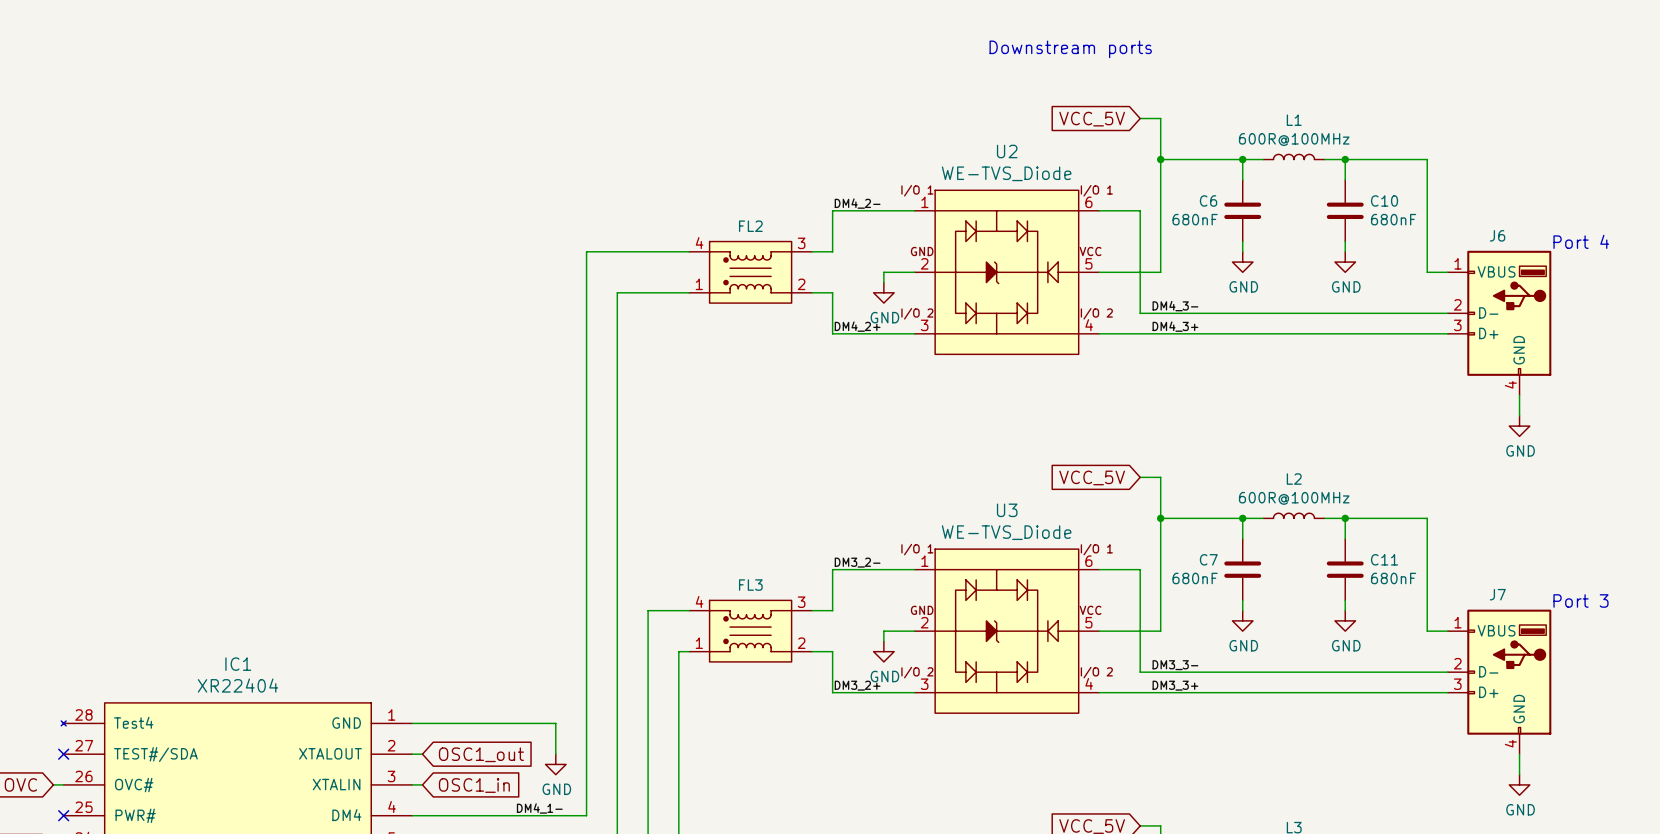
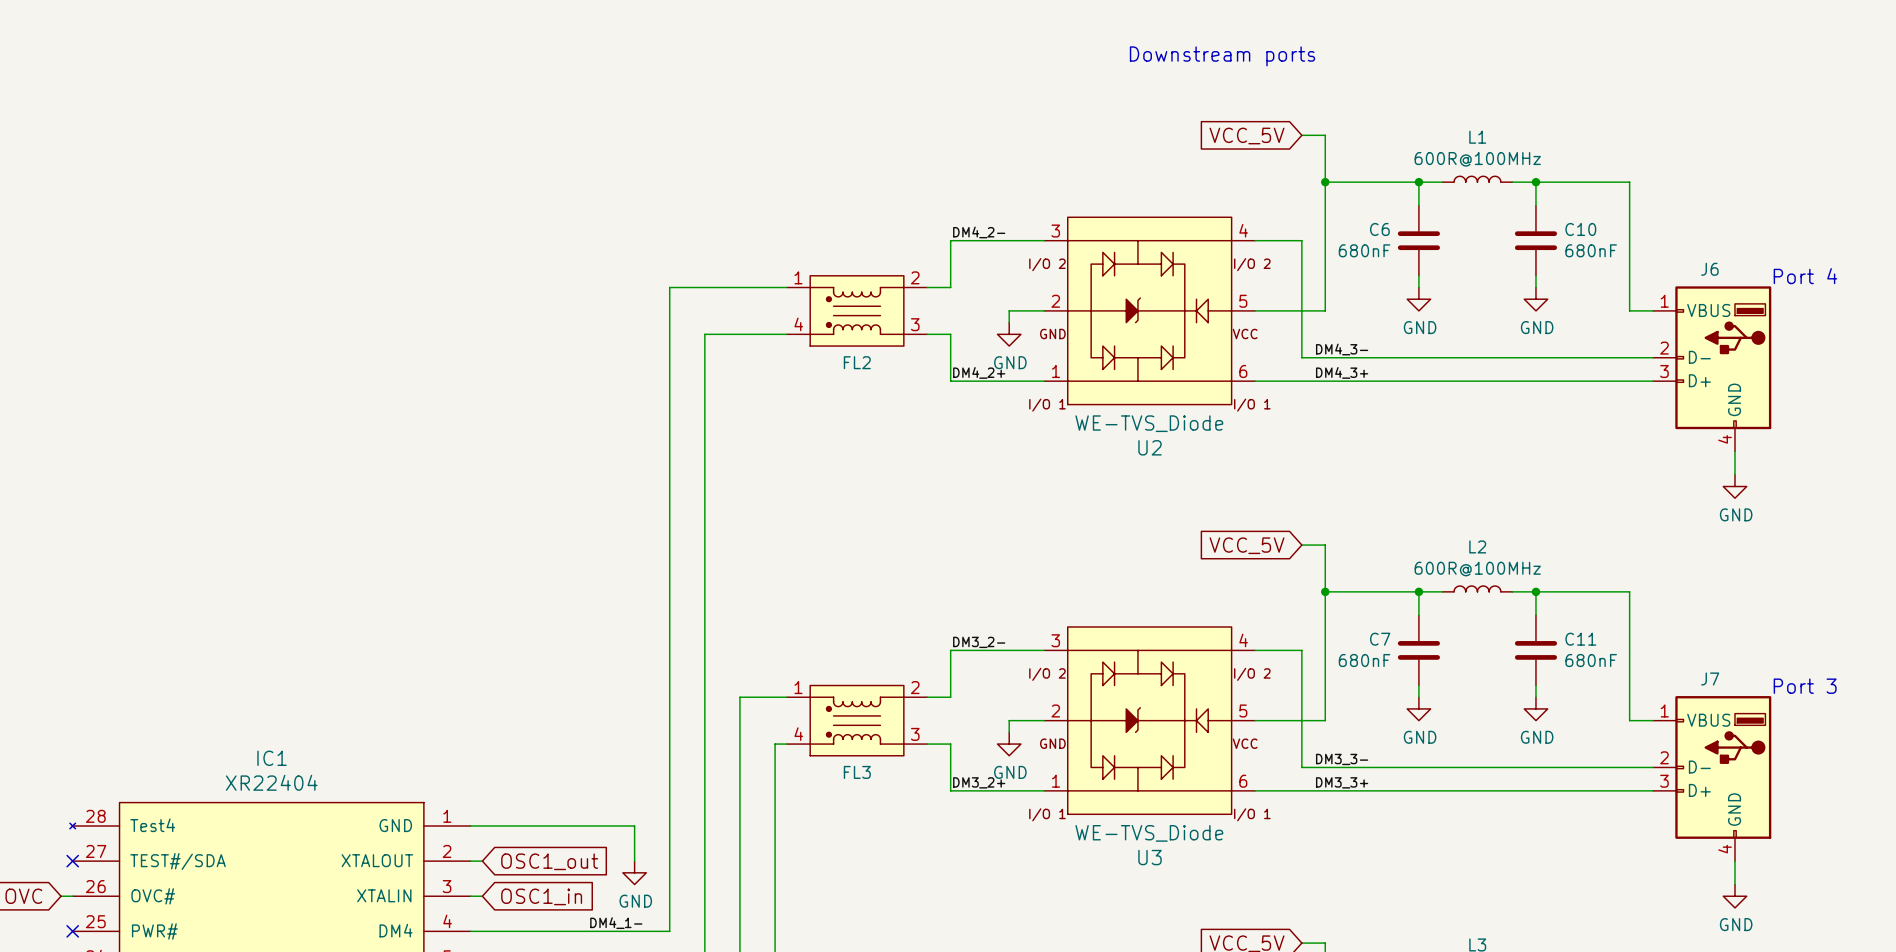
FL2 flip: as is (750, 272) -> up-down (857, 310)
U2 flip: as is (1006, 272) -> up-down (1149, 310)
FL3 flip: as is (750, 631) -> up-down (857, 720)
U3 flip: as is (1006, 631) -> up-down (1149, 720)

